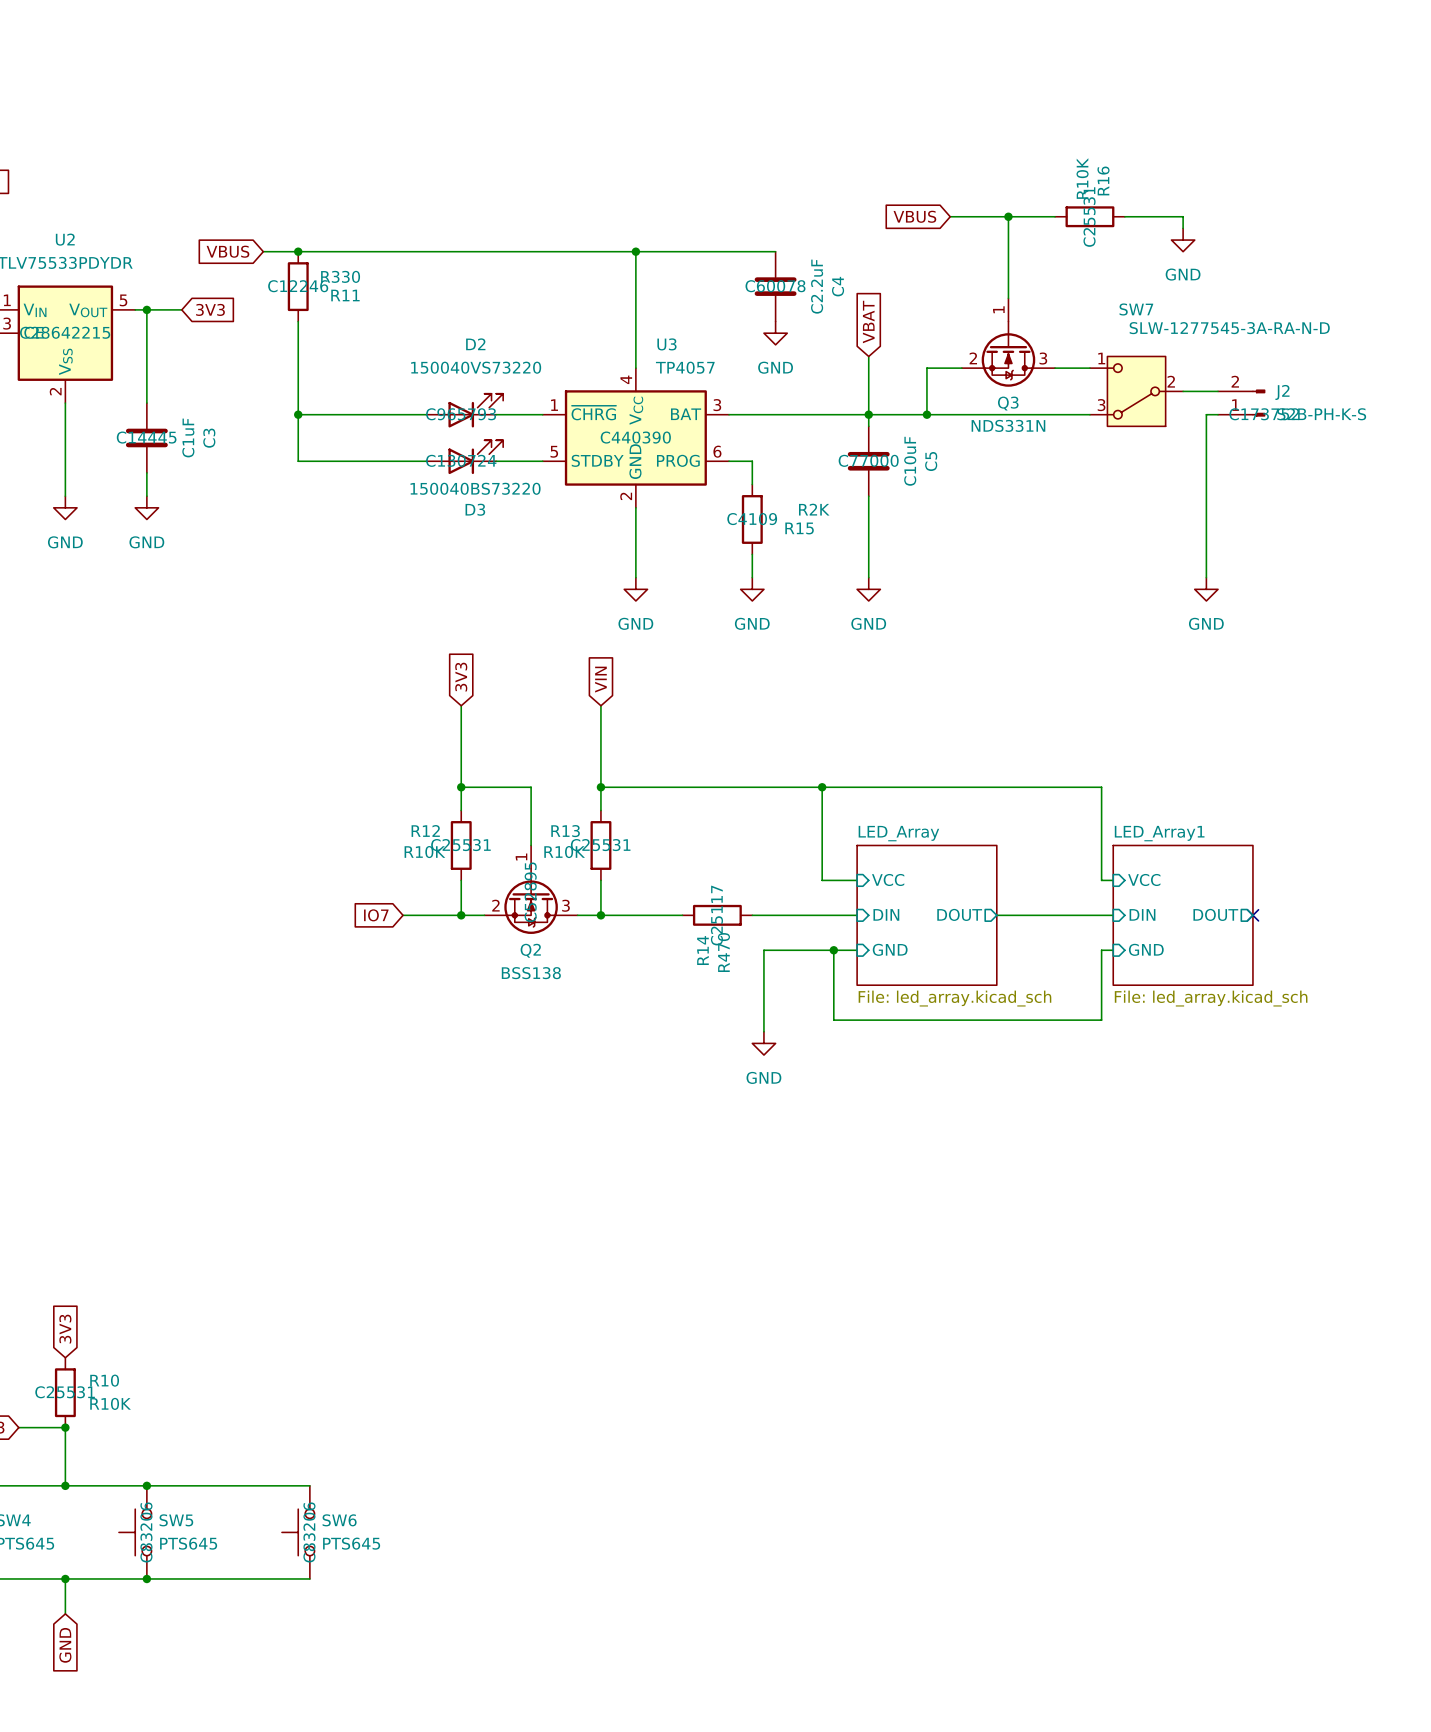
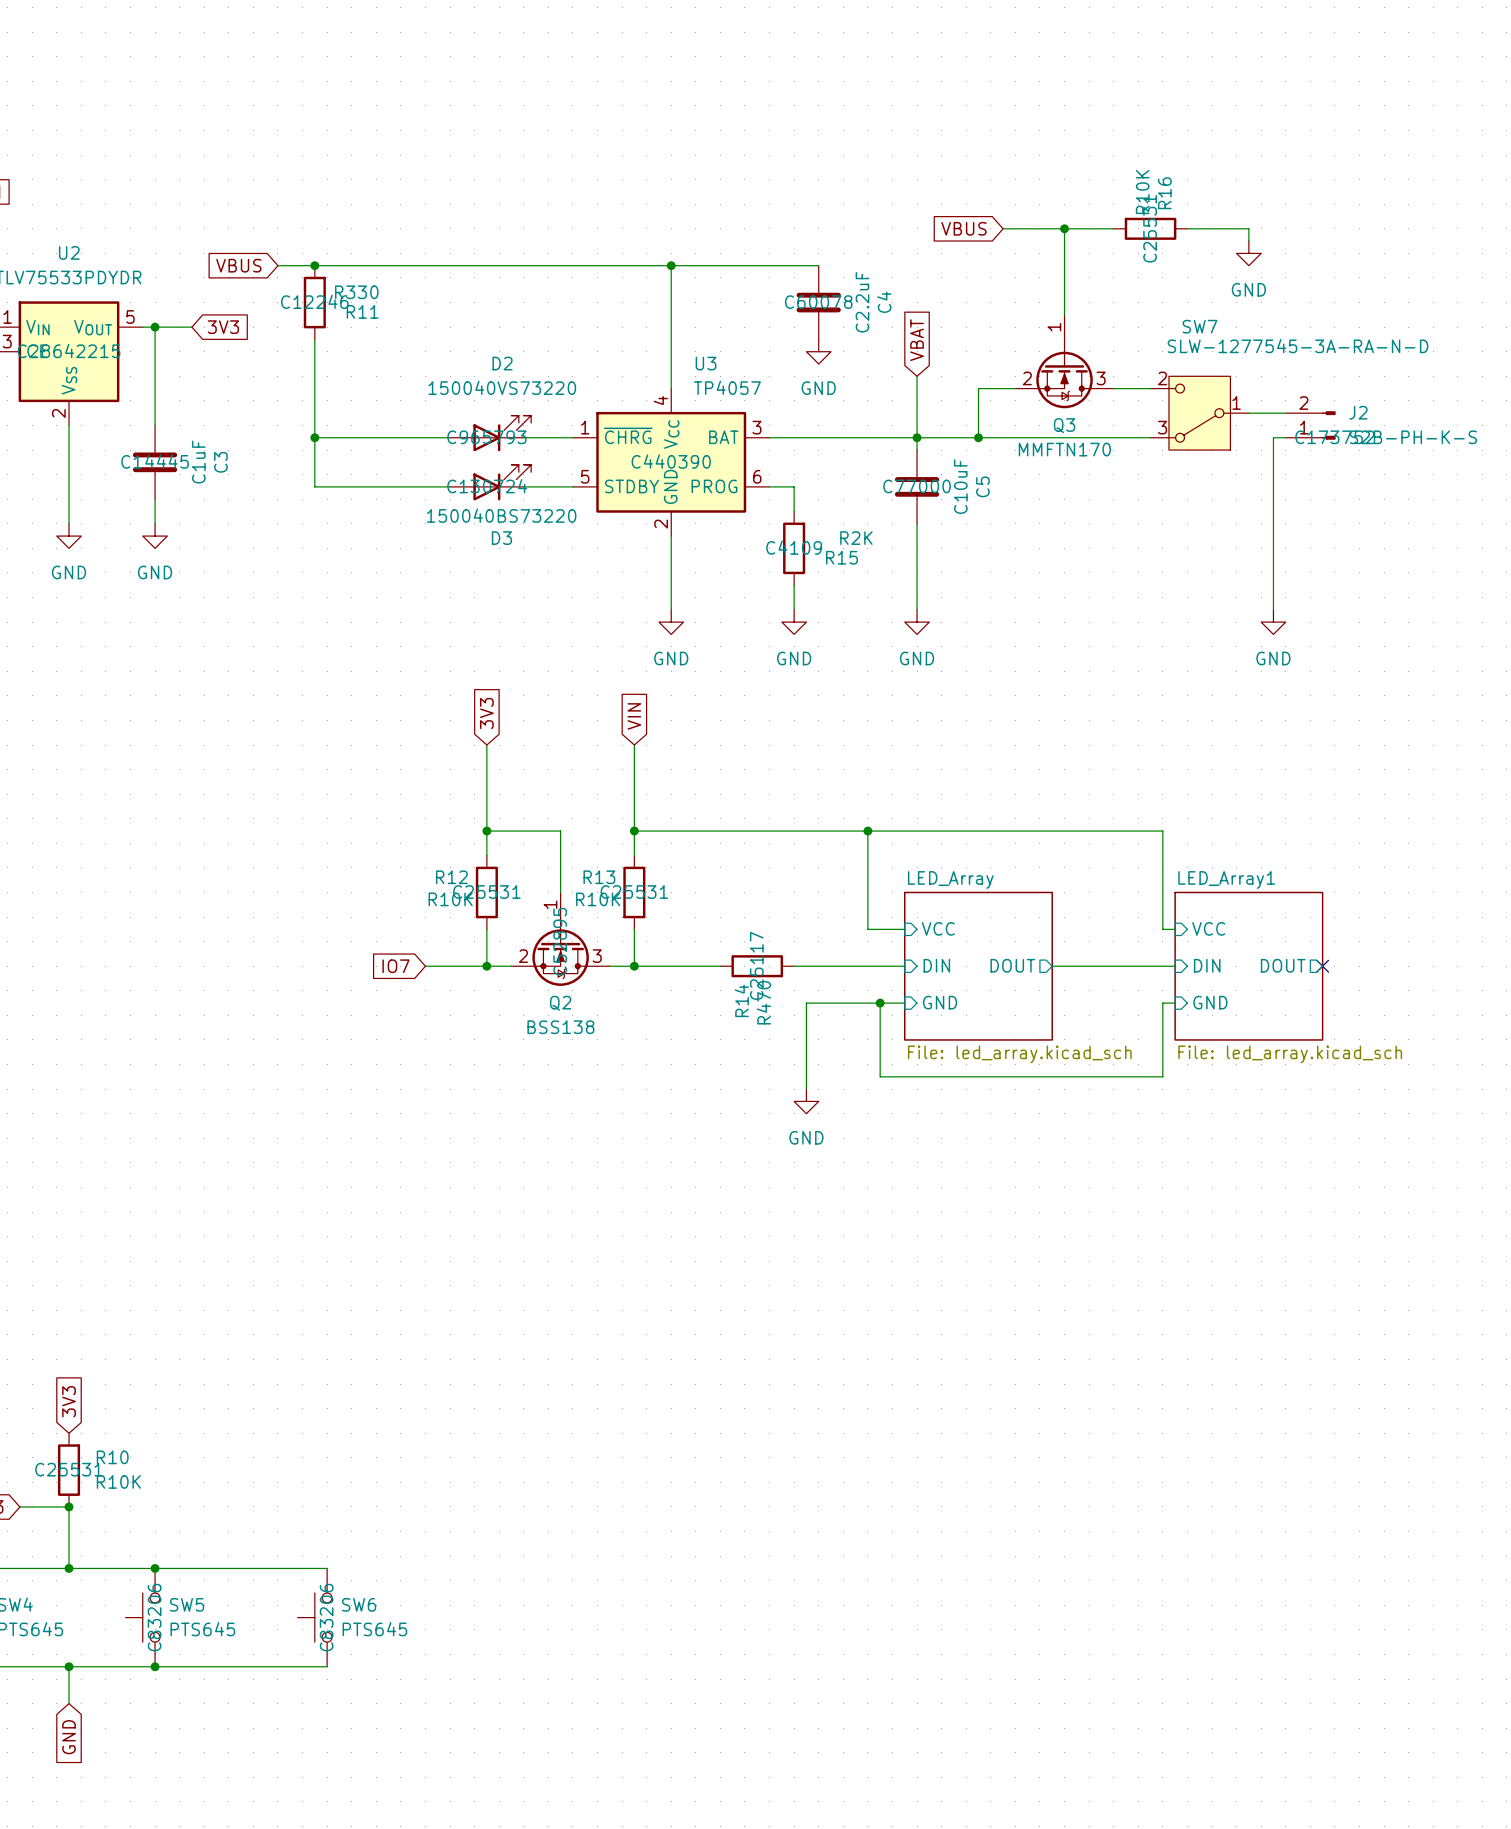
SW7 pin number: 1 (1101, 358) -> 2 (1162, 378)
SW7 pin number: 2 (1171, 381) -> 1 (1236, 403)
Q3 value: NDS331N (1008, 425) -> MMFTN170 (1064, 449)

